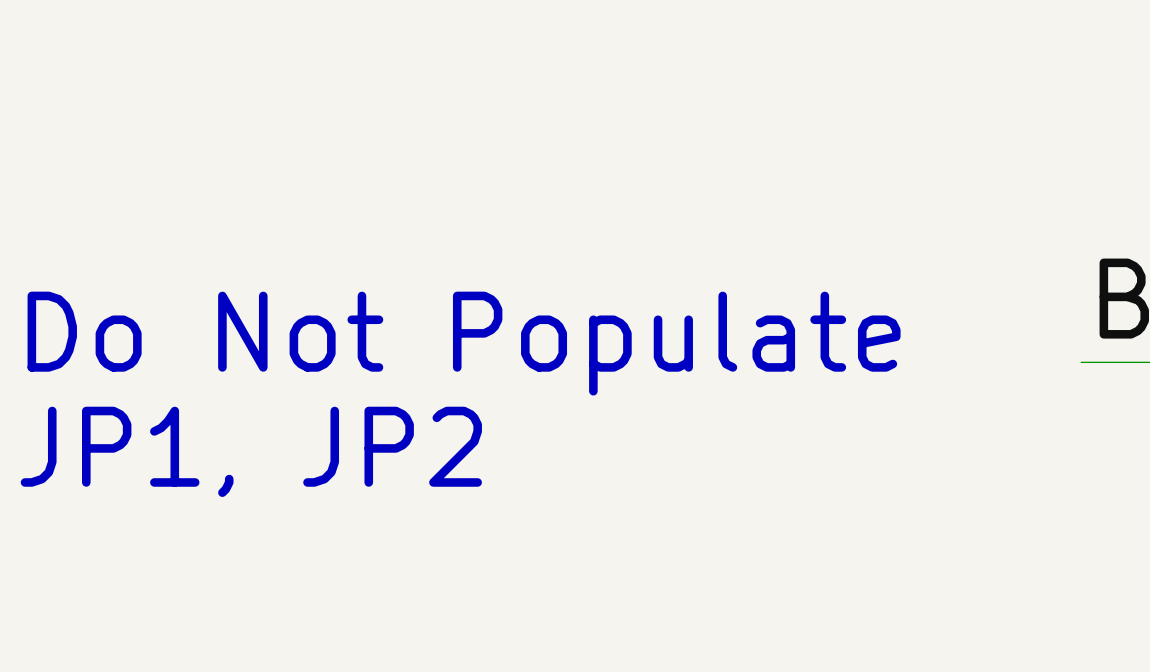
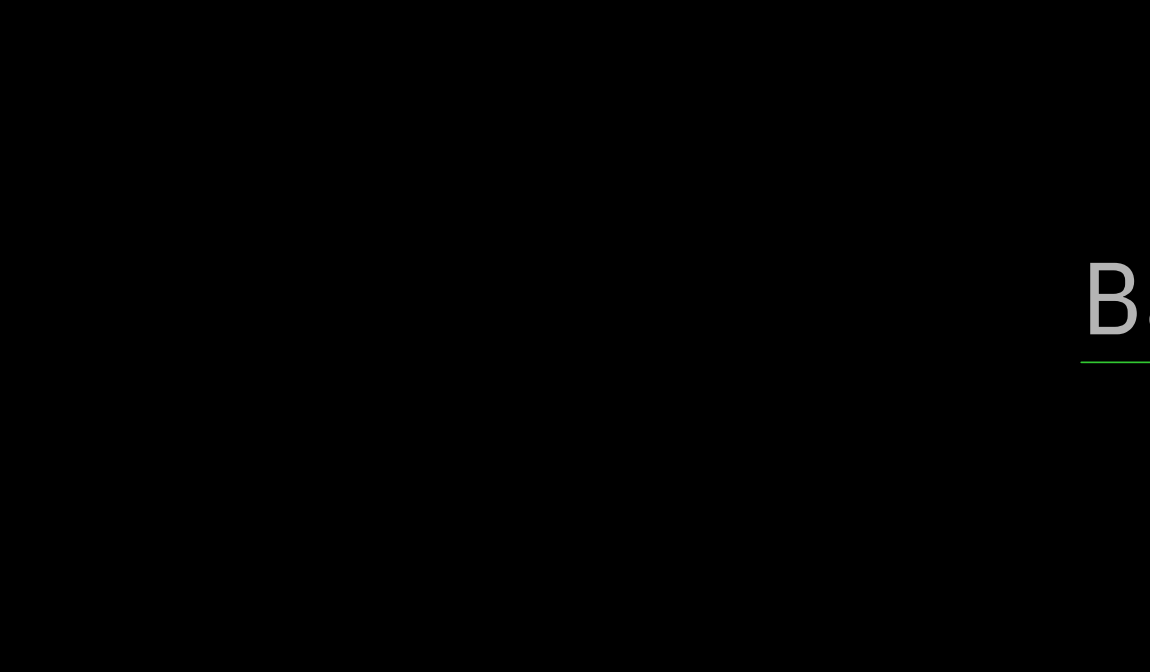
text: Do Not Populate (464, 343) -> none
text: JP1, JP2 (251, 451) -> none

